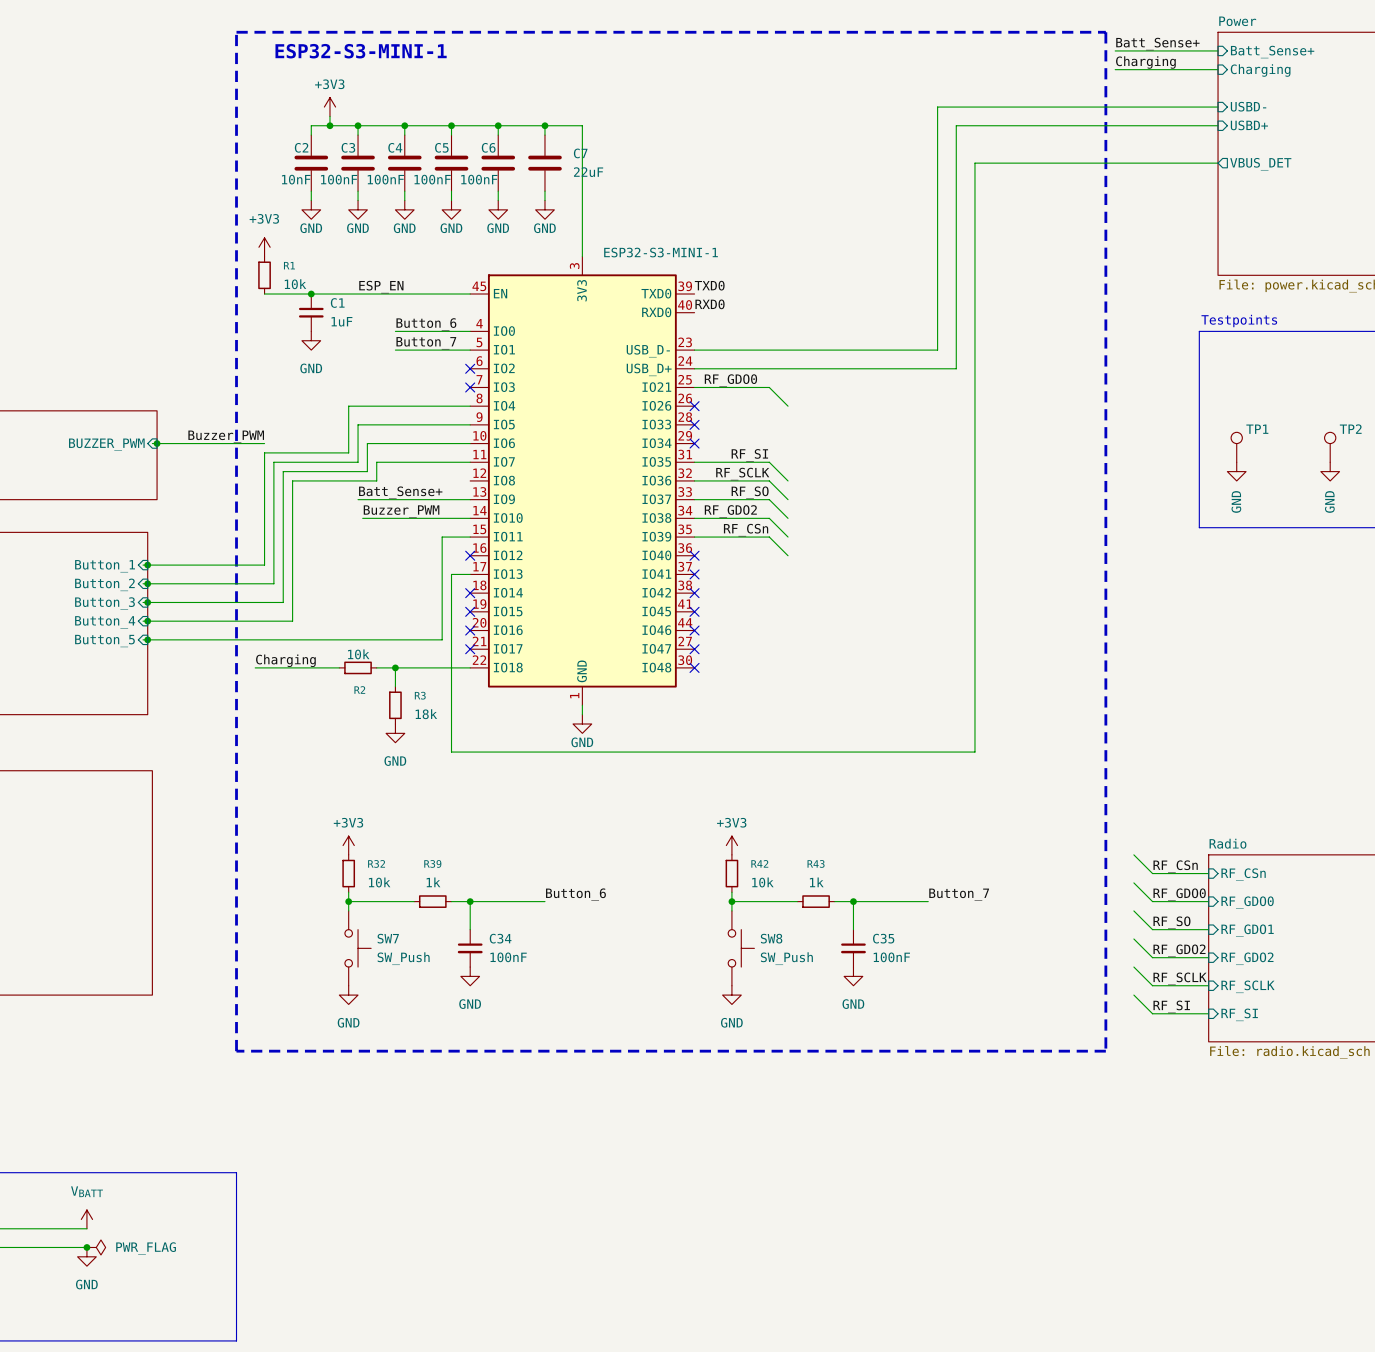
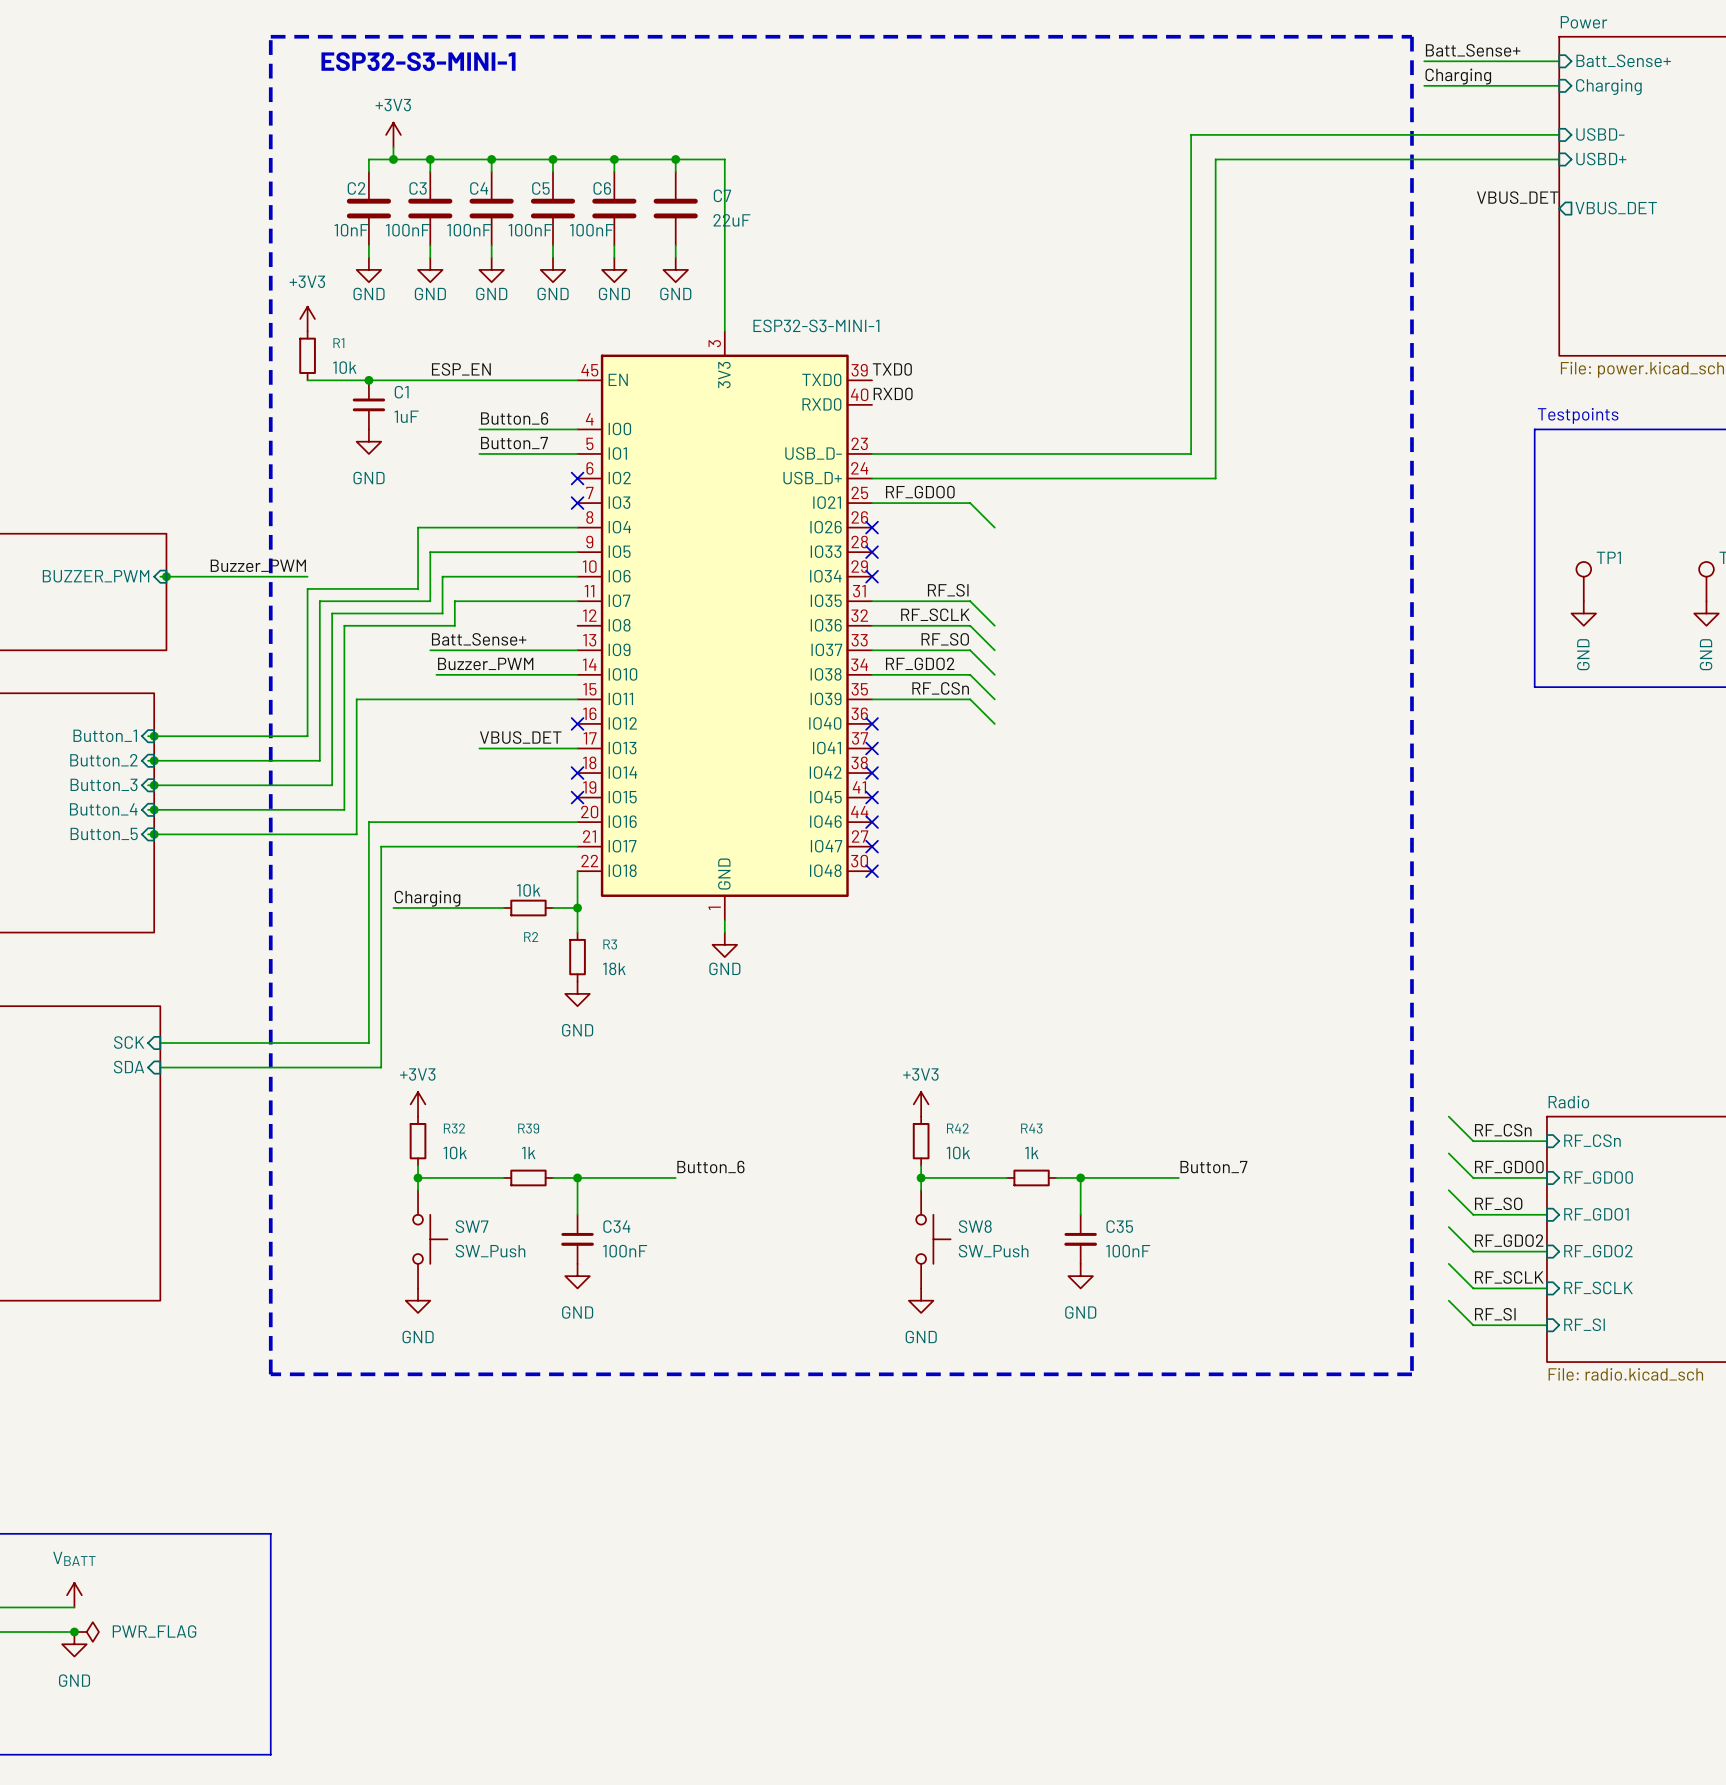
label: none -> VBUS_DET (1517, 197)
wire: (1218, 163) (974, 163) (974, 752) (451, 752) (451, 574) -> (479, 748) (553, 748)
wire: (442, 537) (442, 639) (301, 639) -> (540, 699) (356, 699) (356, 834)
label: none -> VBUS_DET (520, 737)
wire: none -> (577, 822) (368, 822) (368, 1042) (160, 1042)
no-connect mark: (470, 630) -> none
wire: none -> (577, 846) (381, 846) (381, 1067) (160, 1067)
no-connect mark: (470, 649) -> none
label position: Charging (285, 660) -> Charging (427, 898)
wire: (255, 667) (339, 667) -> (393, 908) (503, 908)
R2 position: (358, 667) -> (528, 908)
wire: (376, 667) (470, 667) -> (577, 932) (577, 871)
wire: (395, 667) (395, 686) -> none
junction: (395, 667) -> none
wire: none -> (553, 908) (577, 908)
junction: none -> (577, 908)
R3 position: (395, 705) -> (577, 957)
power symbol position: GND (395, 733) -> GND (577, 993)
sheet pin: none -> SCK (129, 1042)
sheet pin: none -> SDA (129, 1067)

